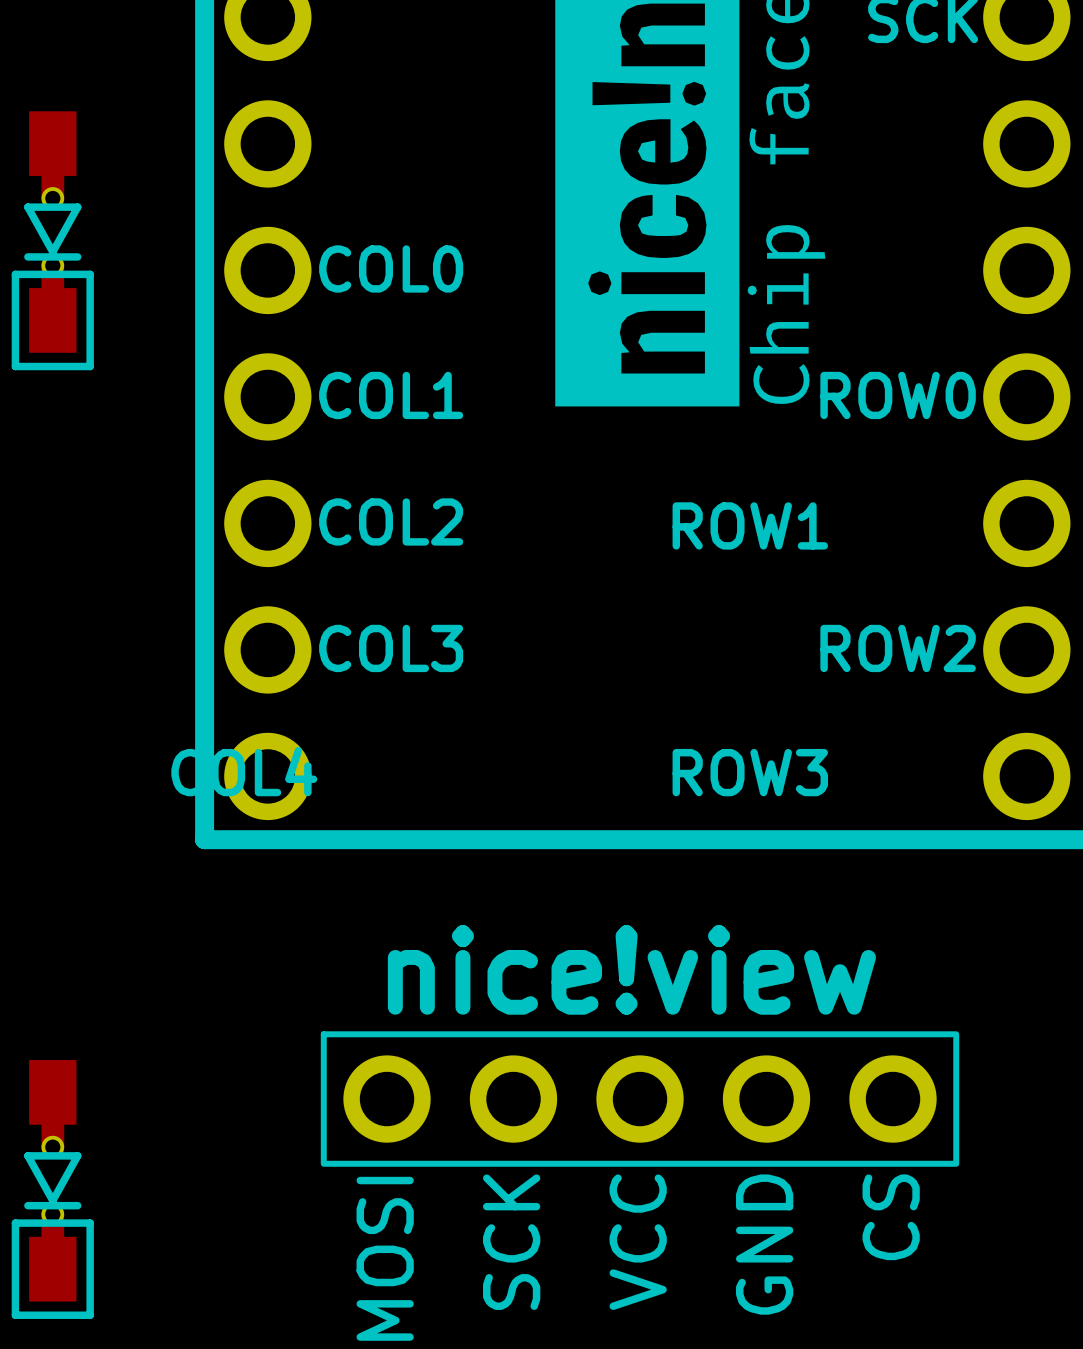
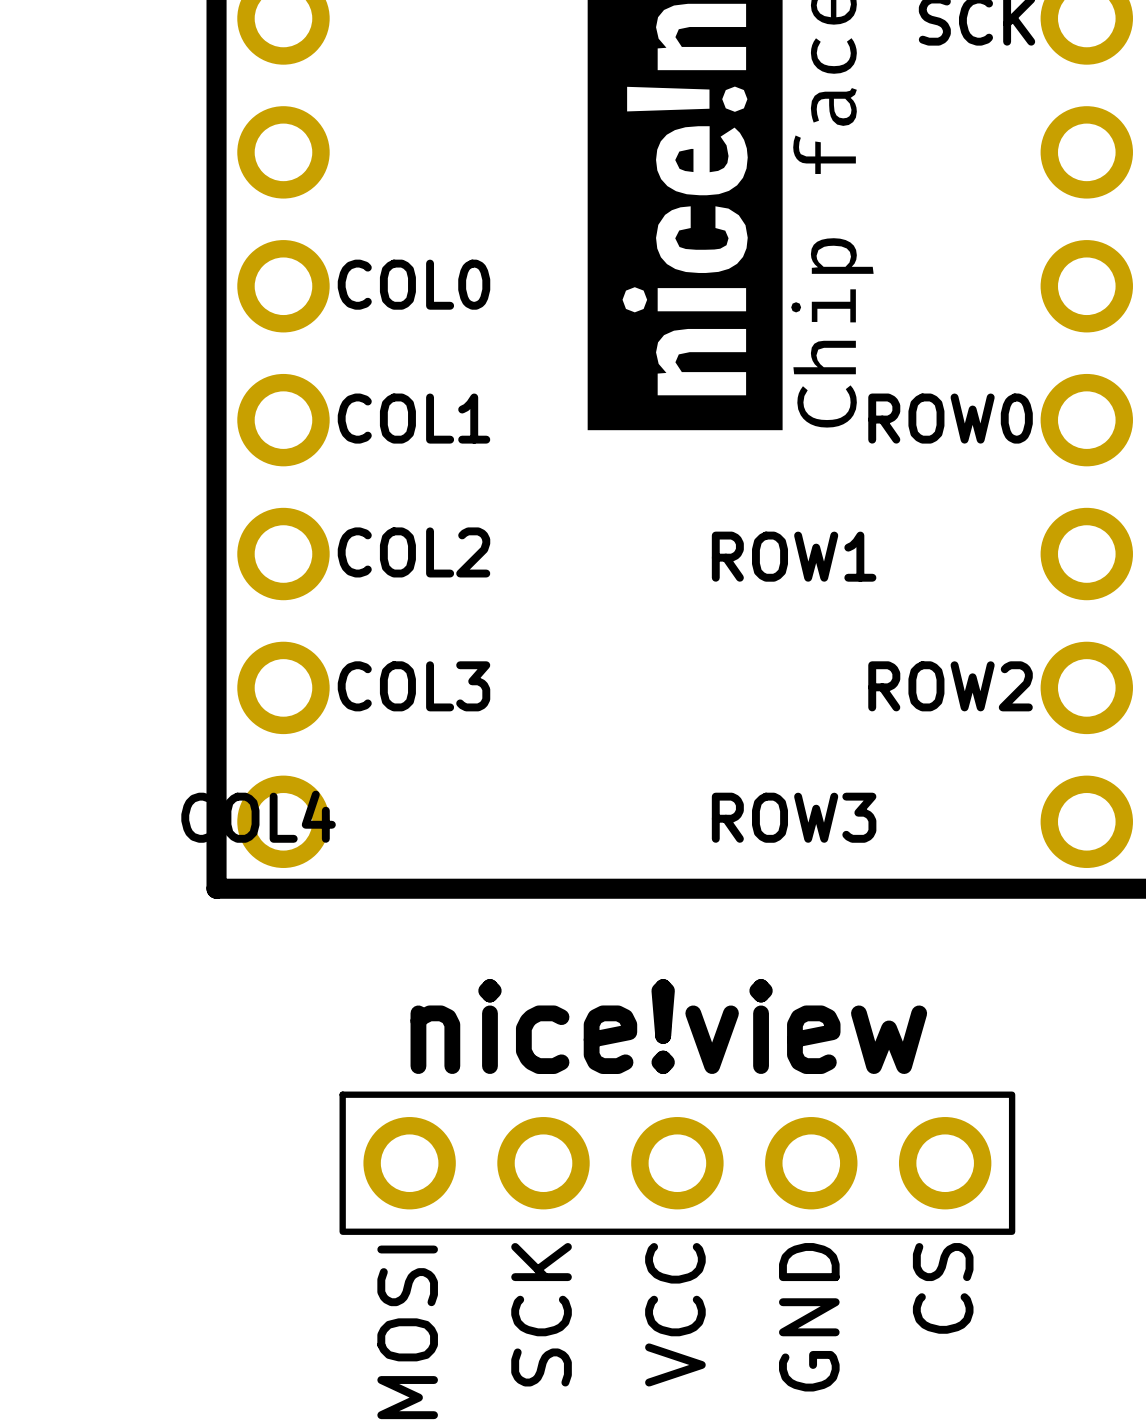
part: (52, 240) -> none
part: (52, 1189) -> none

